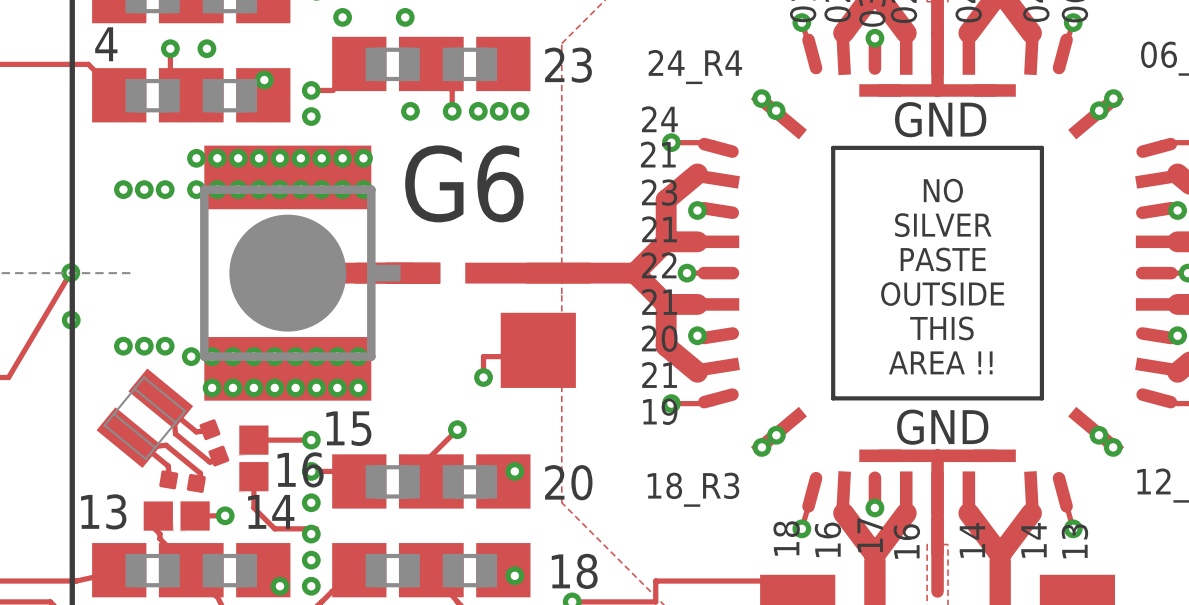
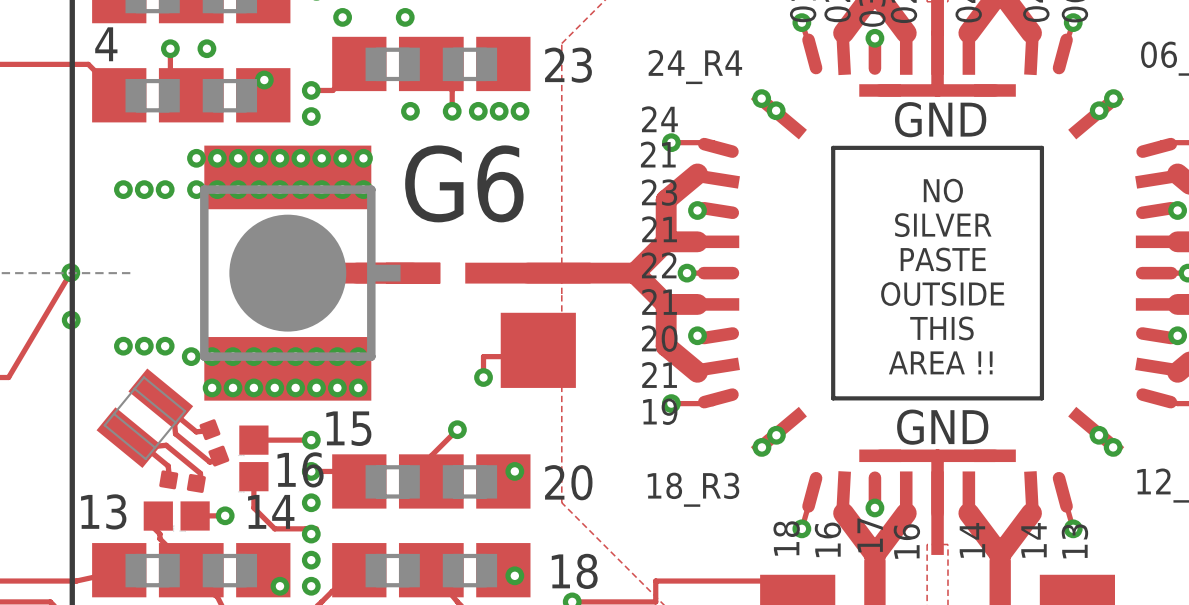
track: (937, 518) (937, 591) -> none

